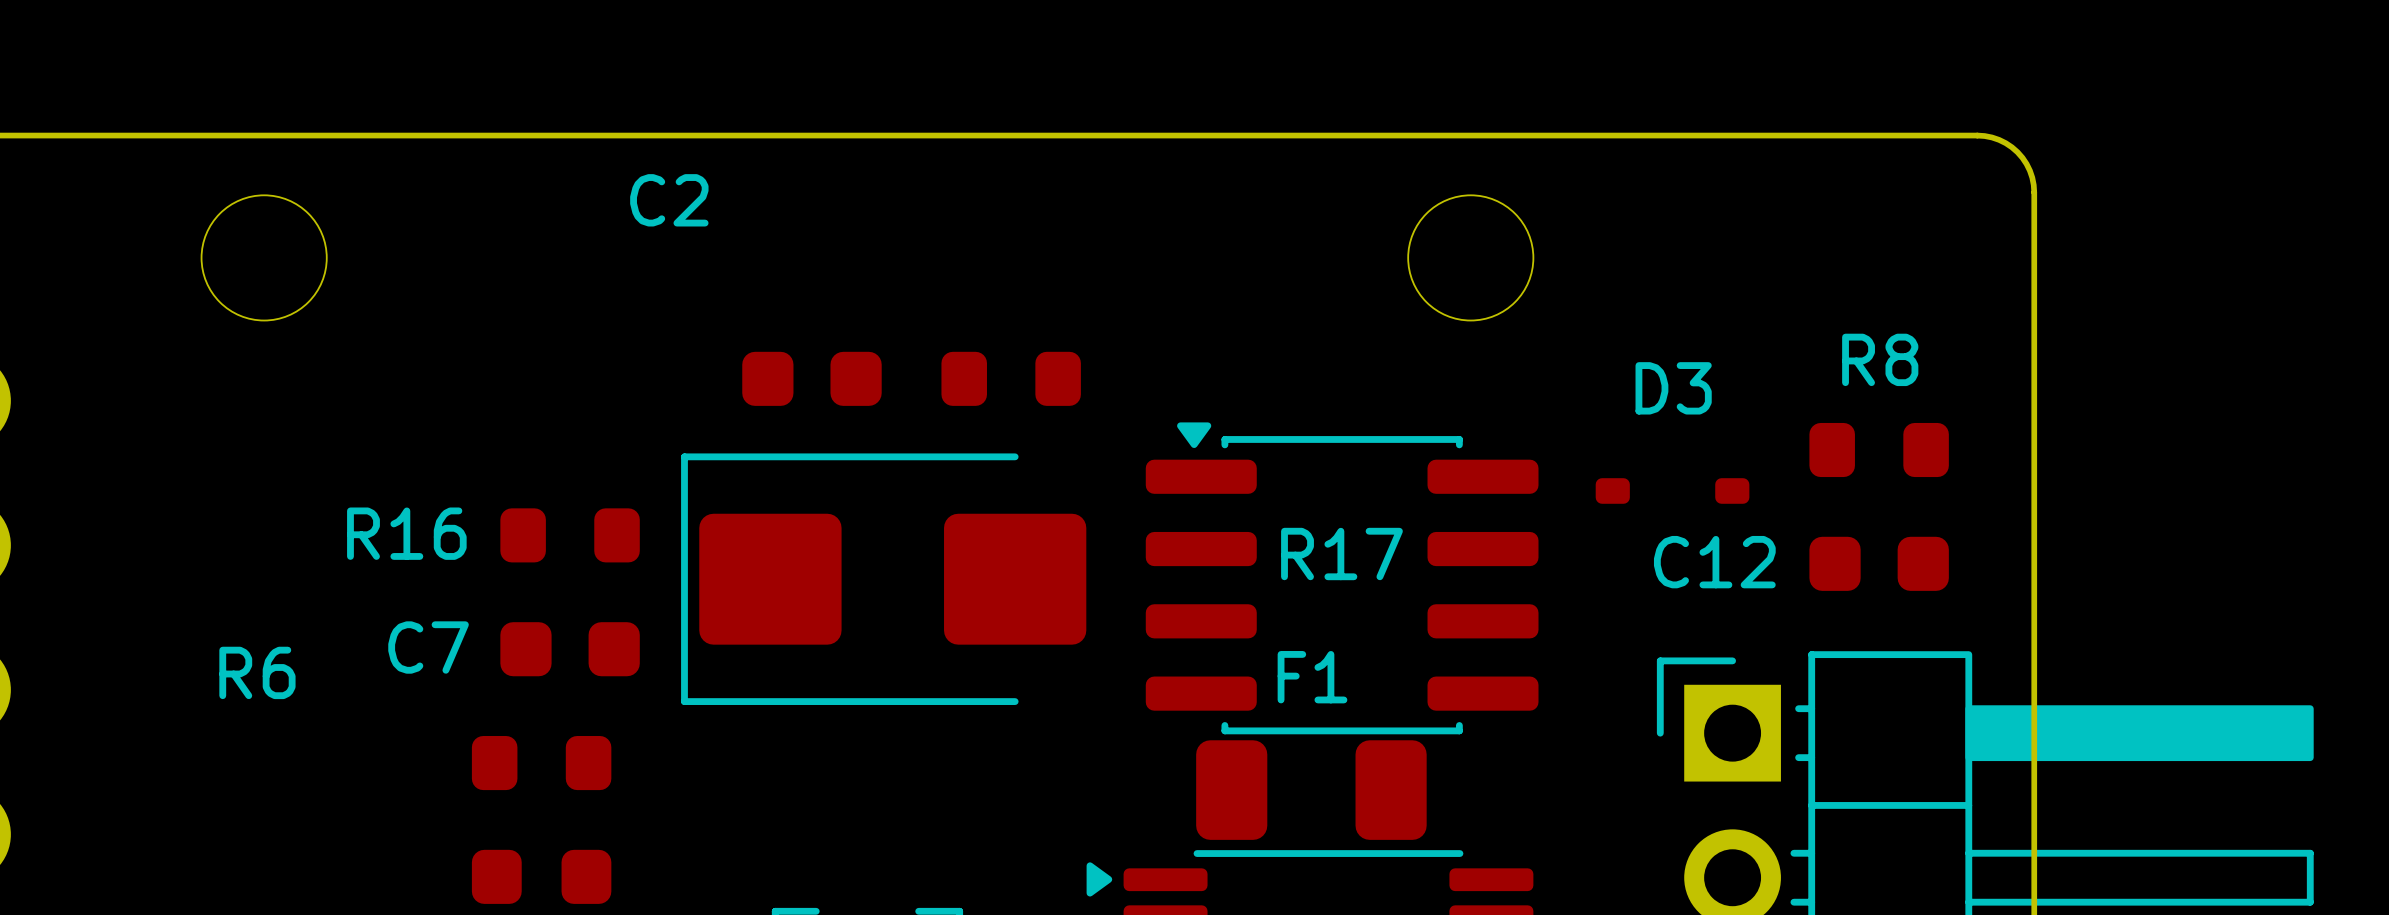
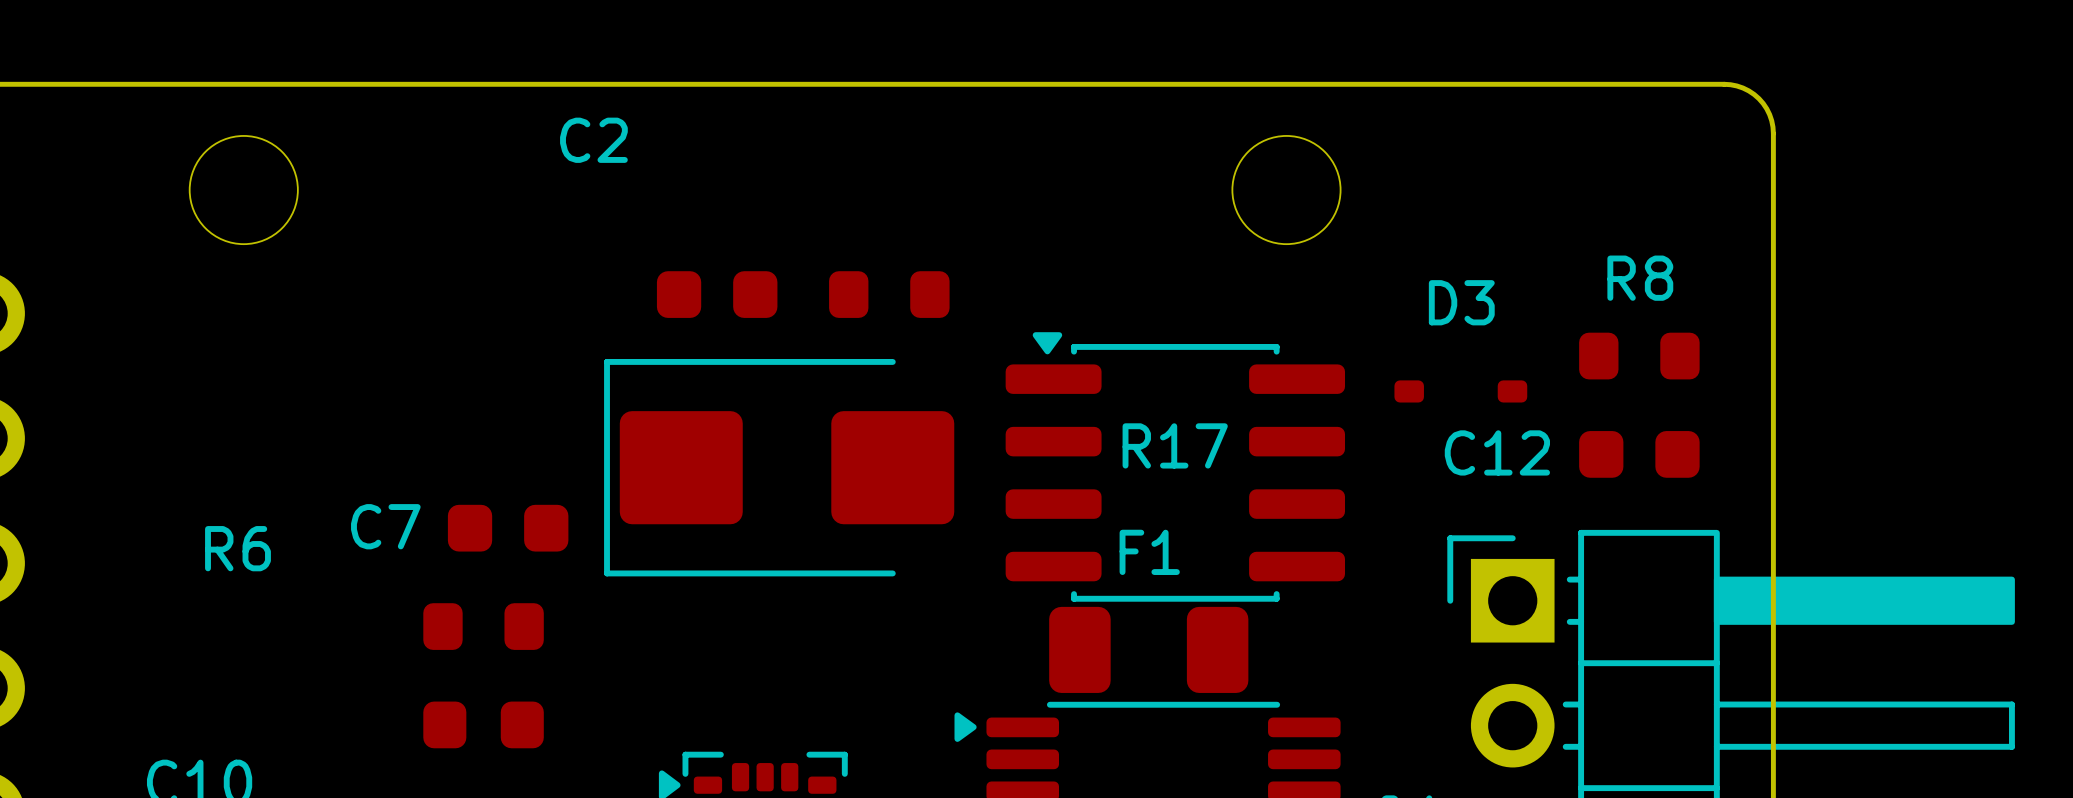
R16: (570, 535) -> none

